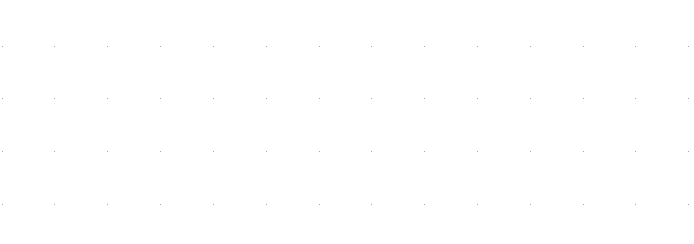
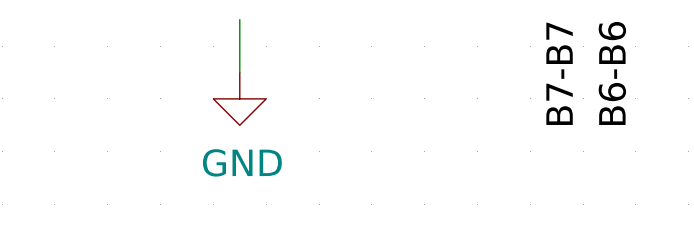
wire: none -> (239, 19) (239, 72)
label: none -> B7-B7 (559, 73)
label: none -> B6-B6 (612, 73)
power symbol: none -> GND (239, 98)

